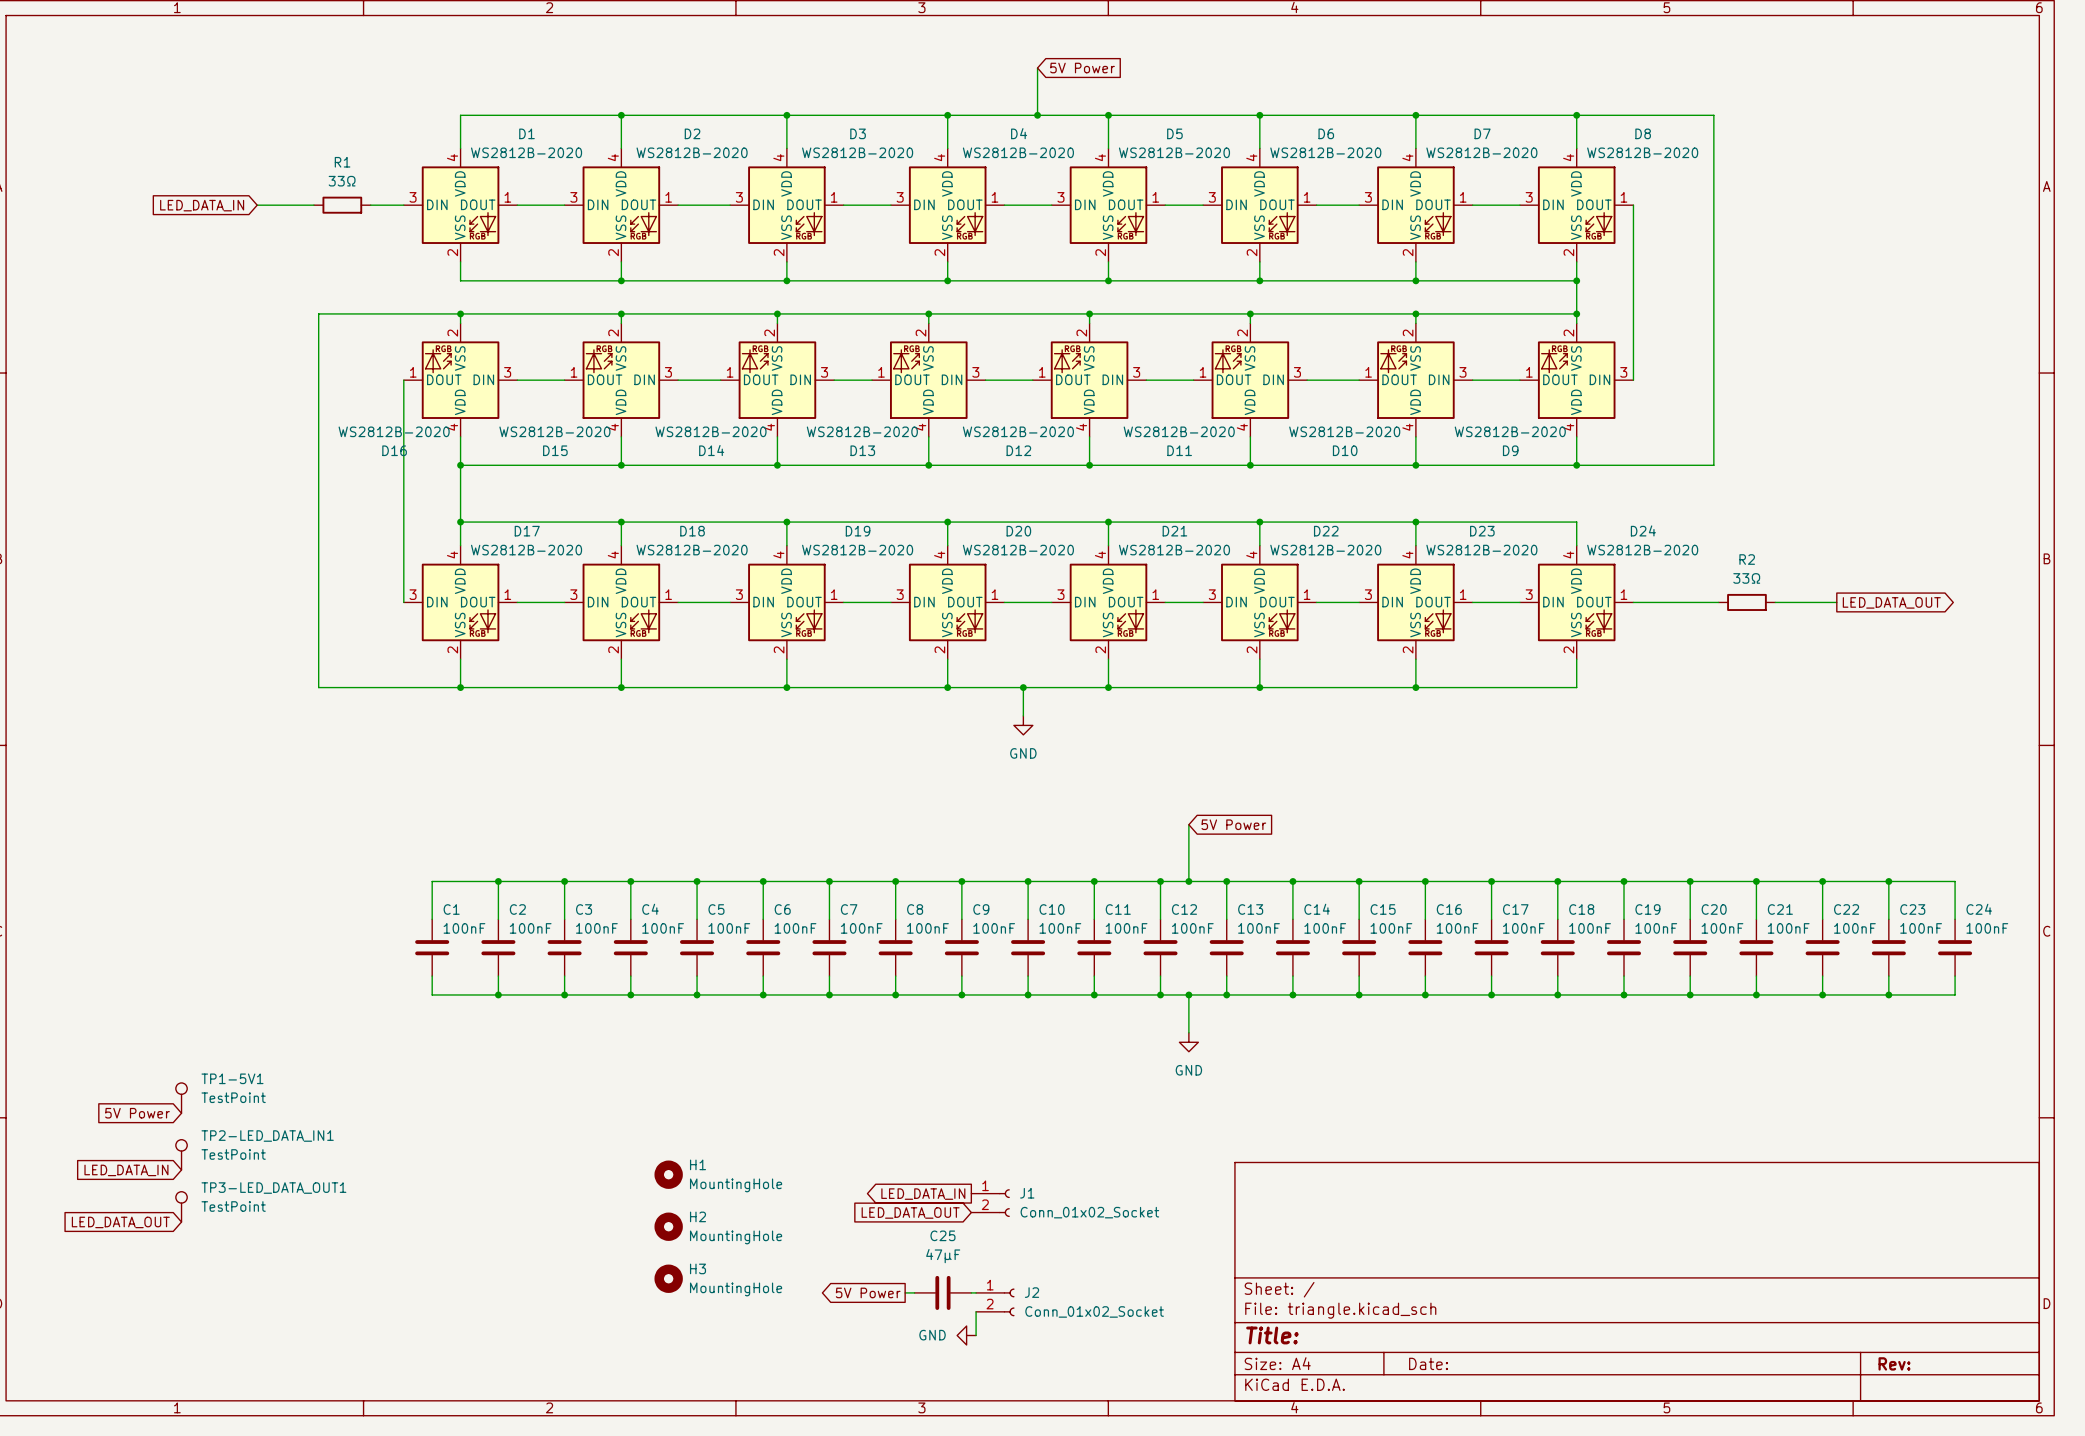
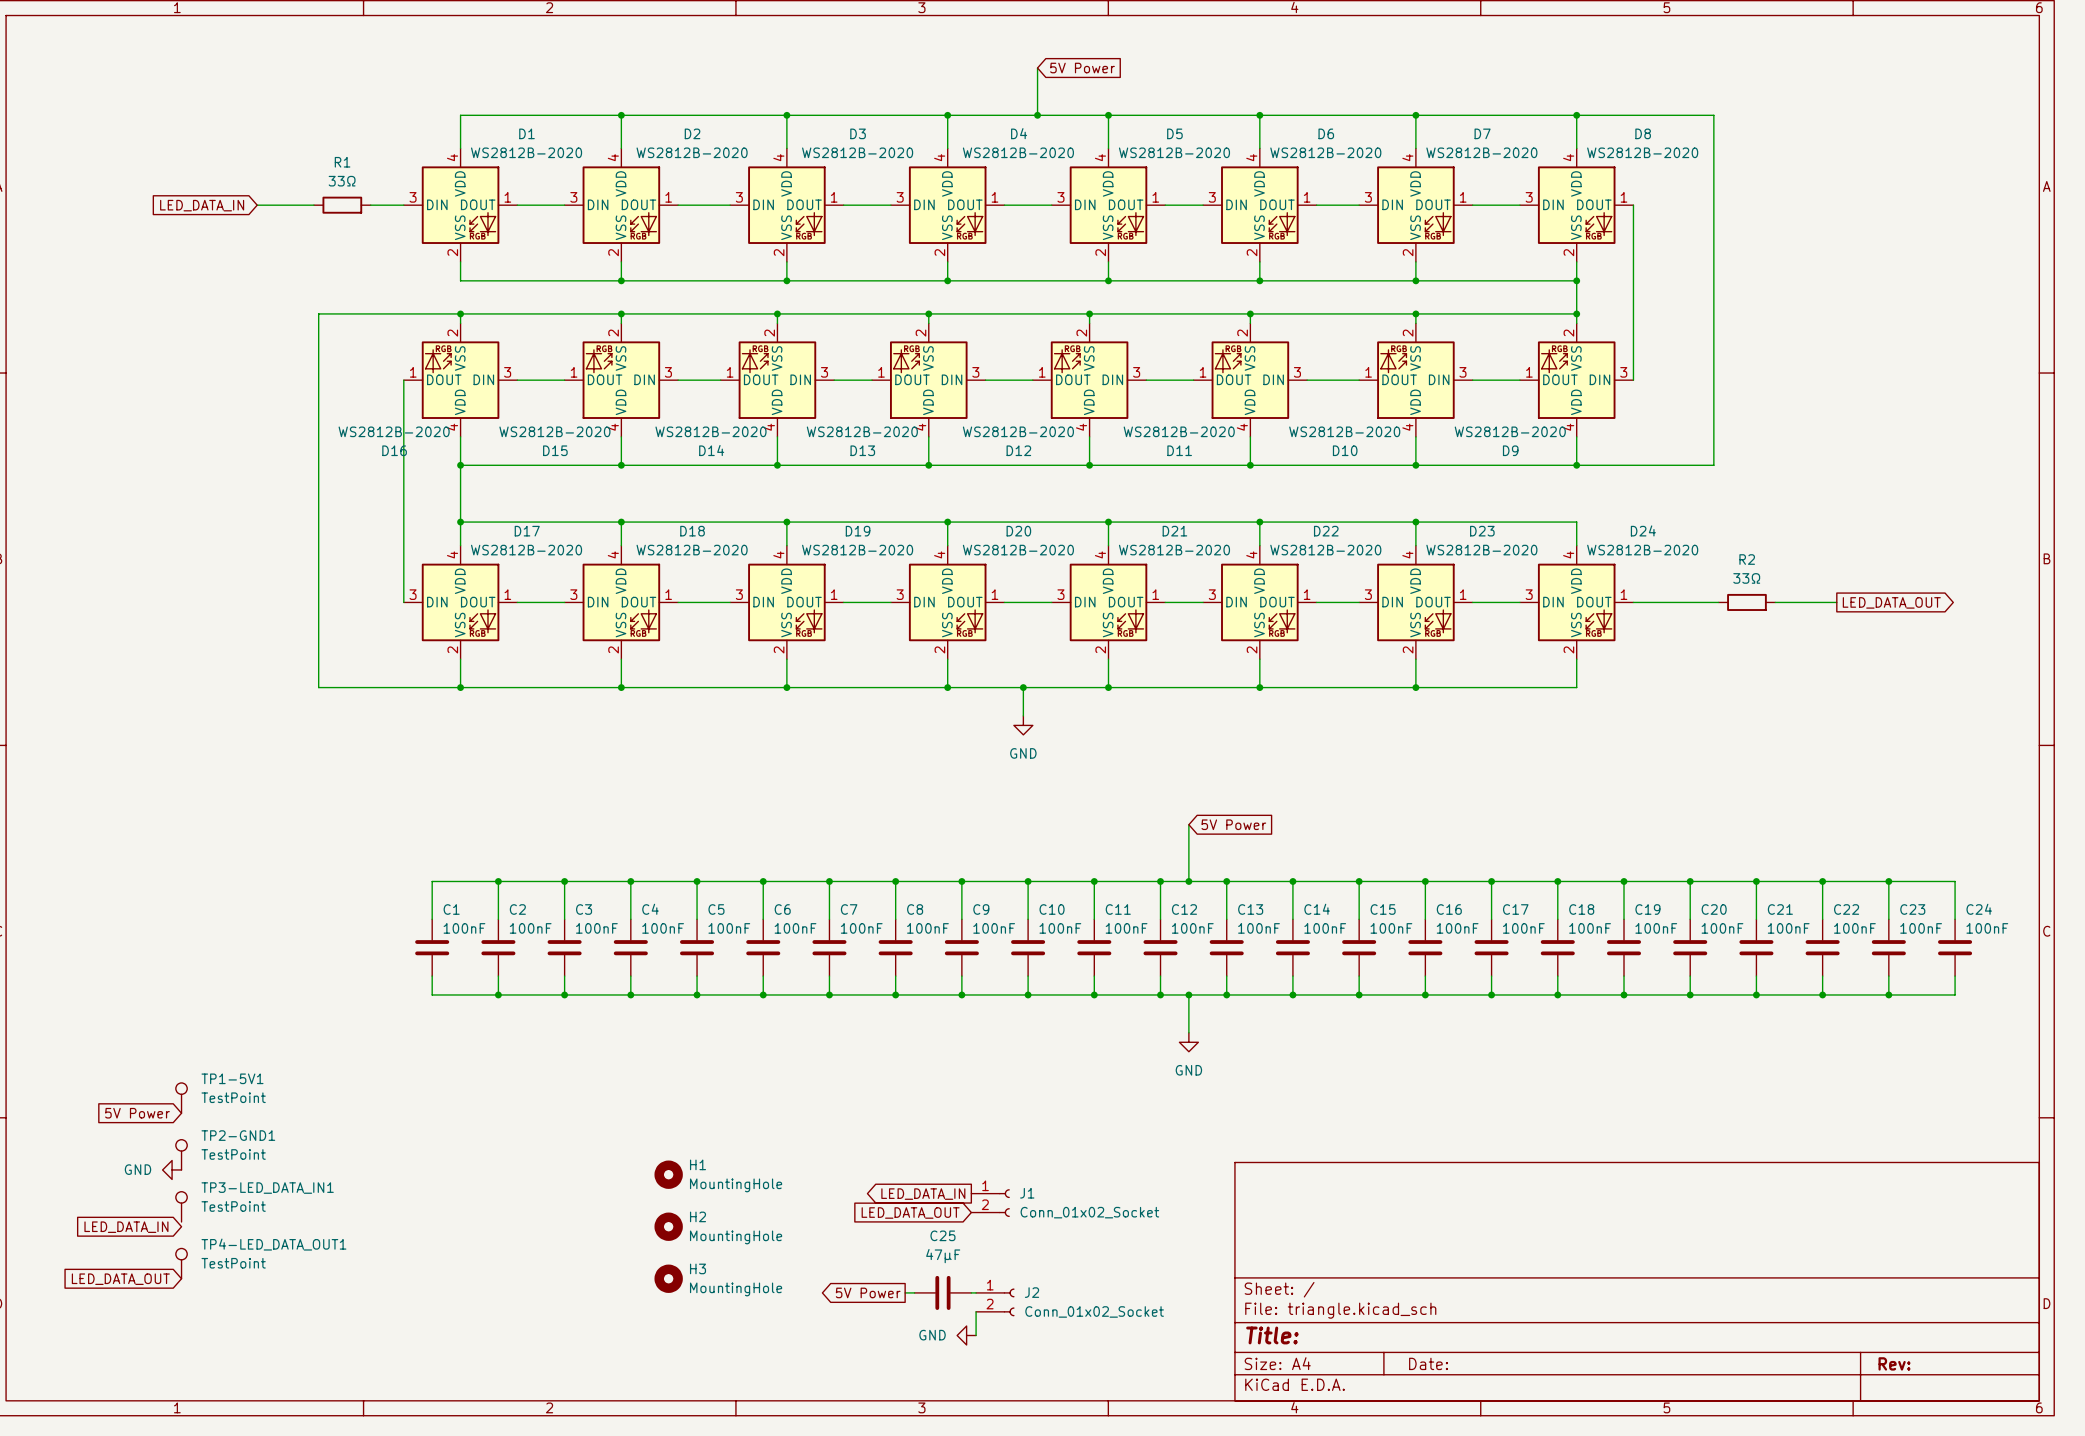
TP2-LED_DATA_IN1 name: TP2-LED_DATA_IN1 (267, 1136) -> TP2-GND1 (238, 1135)
power symbol: none -> GND (172, 1169)
global label: LED_DATA_IN (126, 1170) -> none
TP3-LED_DATA_OUT1 name: TP3-LED_DATA_OUT1 (273, 1188) -> TP3-LED_DATA_IN1 (267, 1188)
global label: LED_DATA_OUT (120, 1222) -> LED_DATA_IN (126, 1227)
TP4-LED_DATA_OUT1: none -> TestPoint (181, 1263)
global label: none -> LED_DATA_OUT (120, 1279)

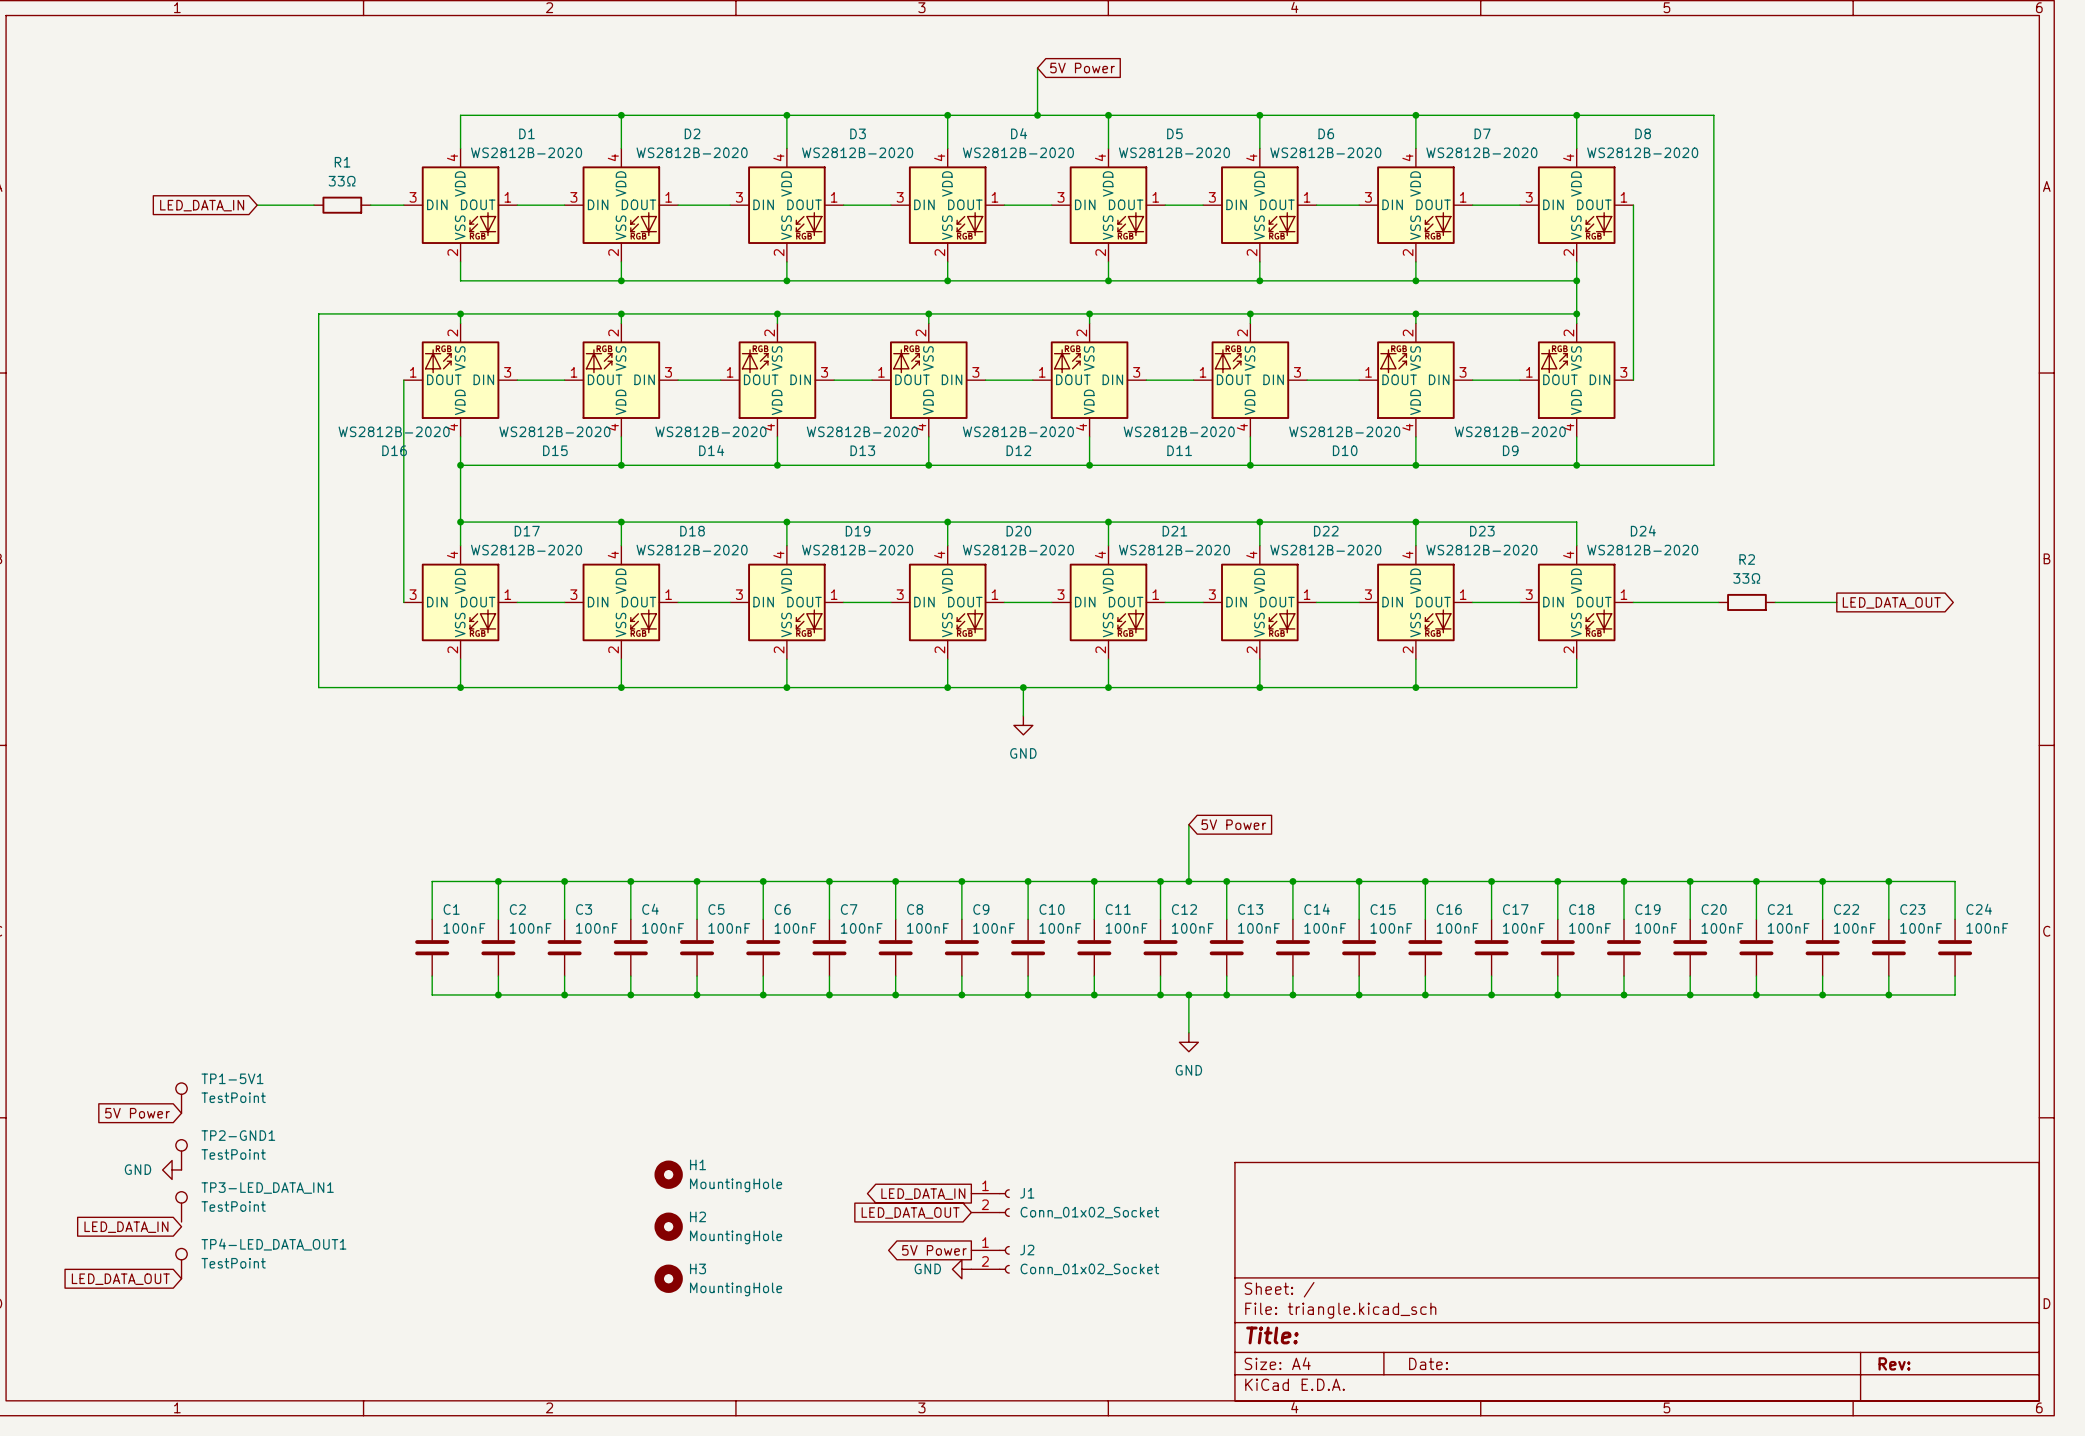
global label position: 5V Power (868, 1292) -> 5V Power (934, 1250)
wire: (905, 1292) (914, 1292) -> none
C25: 47µF (942, 1292) -> none
wire: (971, 1292) (976, 1292) -> none
J2 position: (995, 1302) -> (990, 1259)
wire: (976, 1311) (976, 1335) -> none
power symbol position: GND (966, 1335) -> GND (961, 1269)

